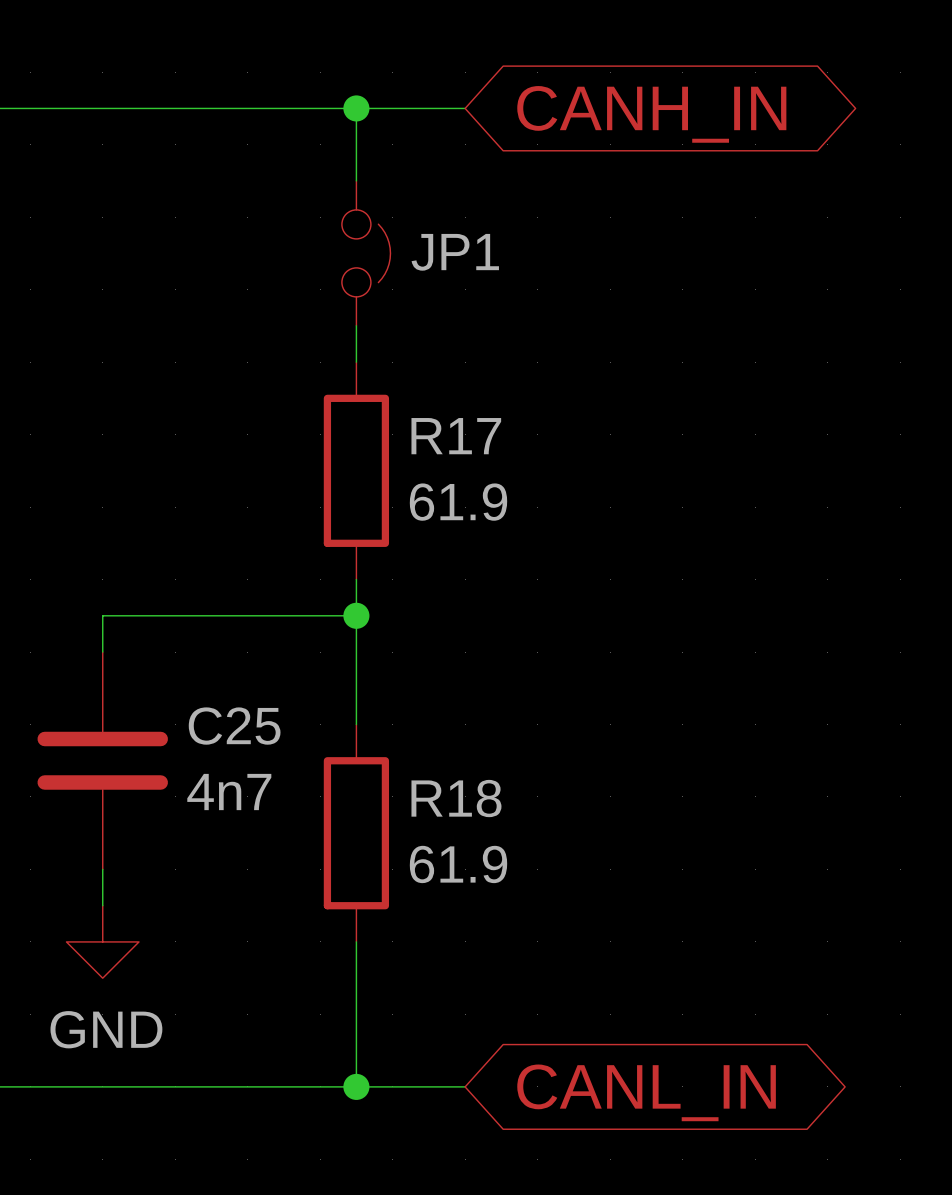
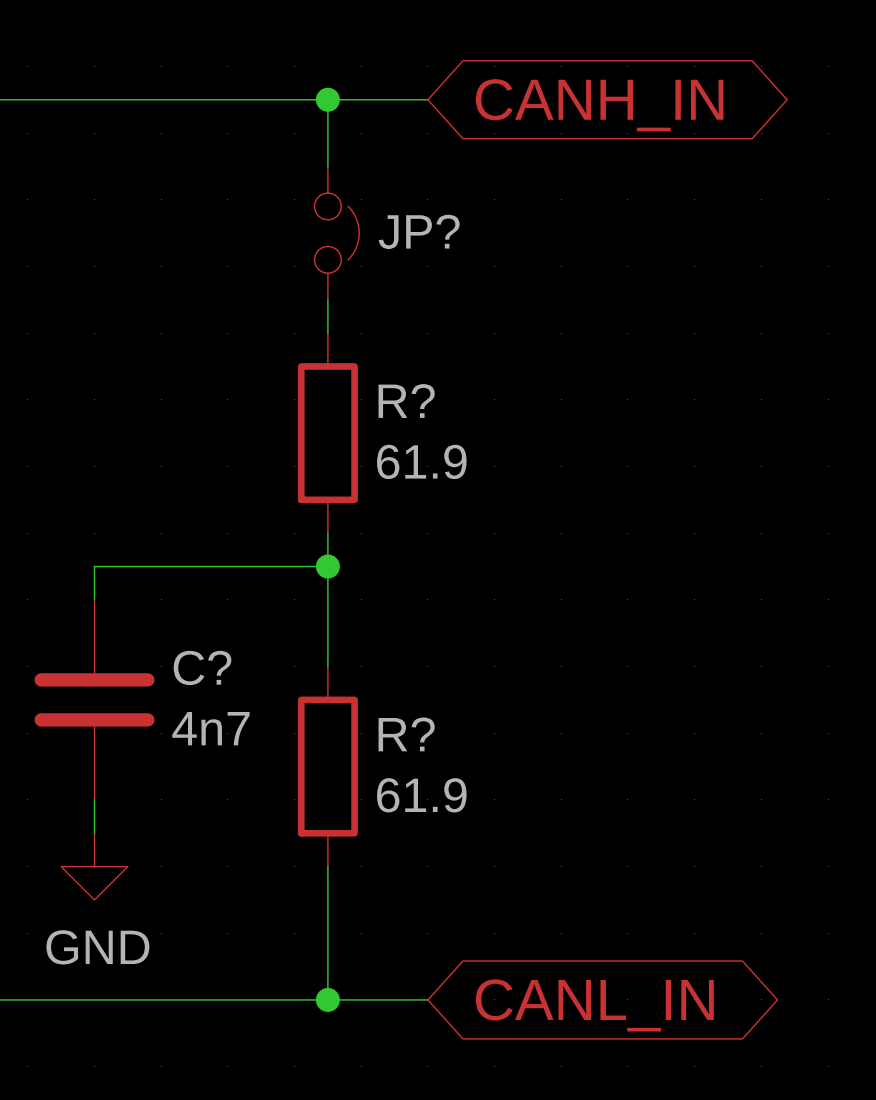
JP1 name: JP1 (455, 252) -> JP? (419, 231)
R17 name: R17 (456, 436) -> R? (406, 401)
C25 name: C25 (234, 726) -> C? (202, 667)
R18 name: R18 (456, 798) -> R? (406, 734)

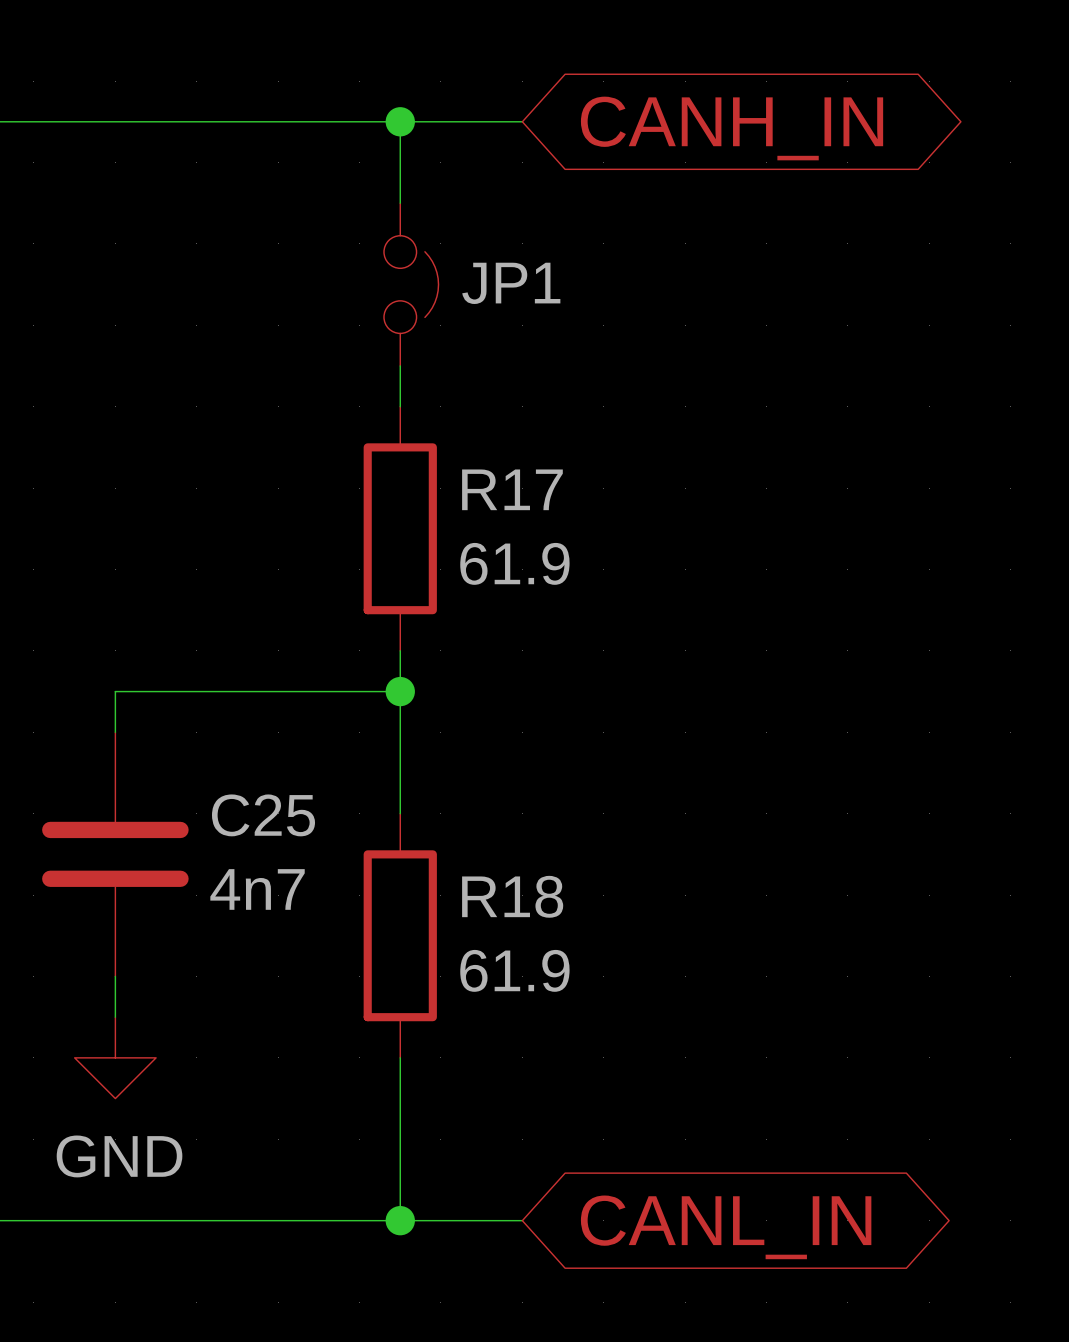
JP? name: JP? (419, 231) -> JP1 (511, 283)
R? name: R? (406, 401) -> R17 (512, 489)
C? name: C? (202, 667) -> C25 (263, 815)
R? name: R? (406, 734) -> R18 (512, 896)

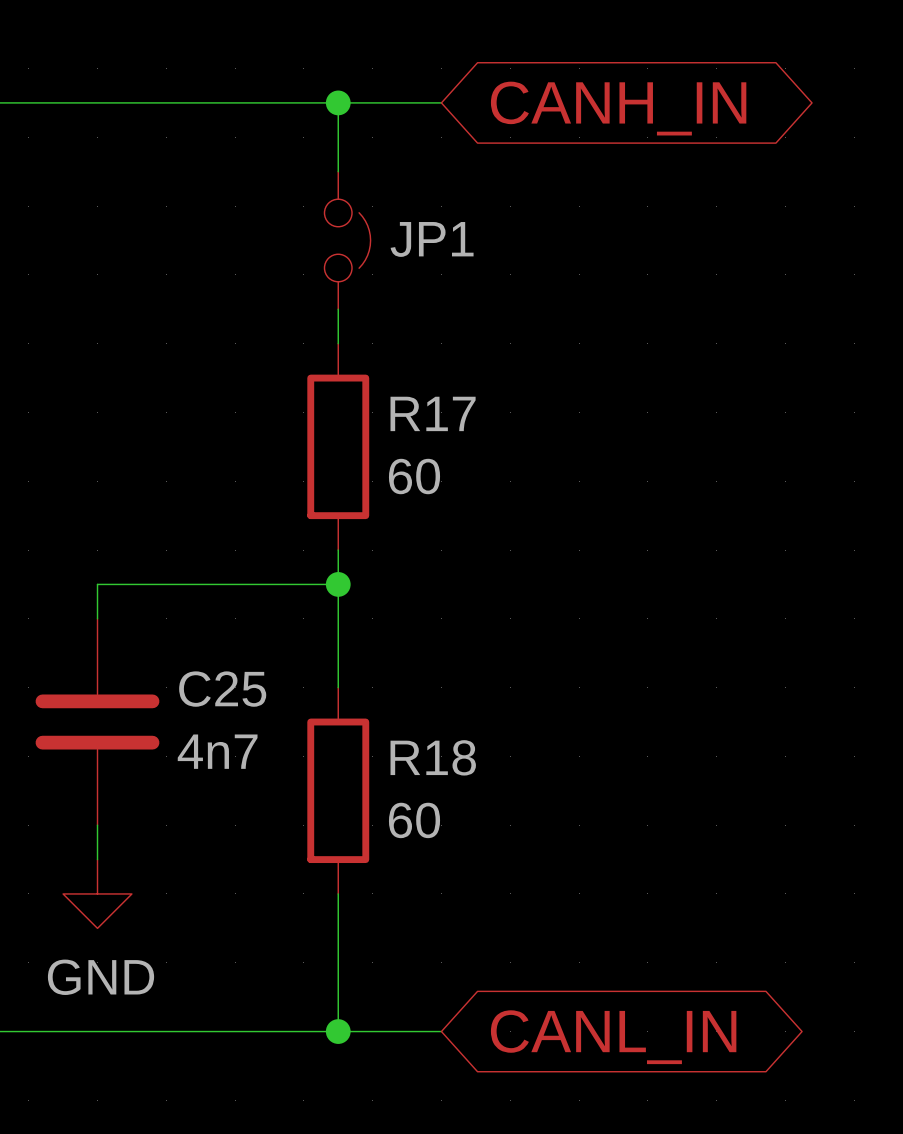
R17 value: 61.9 (514, 563) -> 60 (414, 476)
R18 value: 61.9 (514, 970) -> 60 (414, 820)

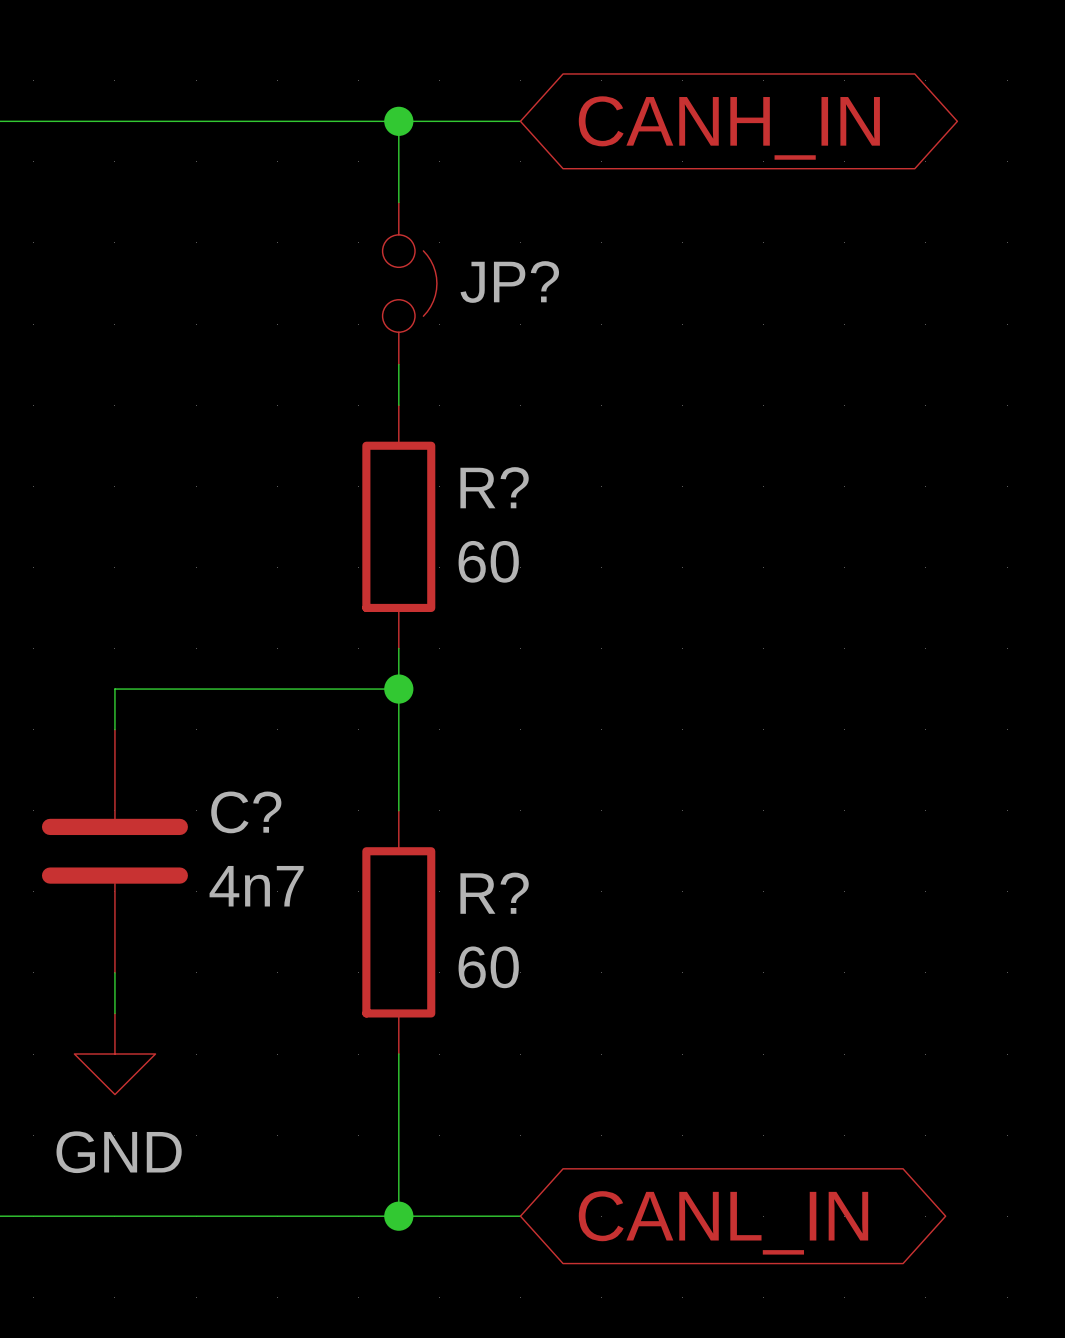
JP1 name: JP1 (432, 239) -> JP? (509, 282)
R17 name: R17 (433, 413) -> R? (494, 487)
C25 name: C25 (222, 689) -> C? (246, 812)
R18 name: R18 (433, 757) -> R? (494, 893)

